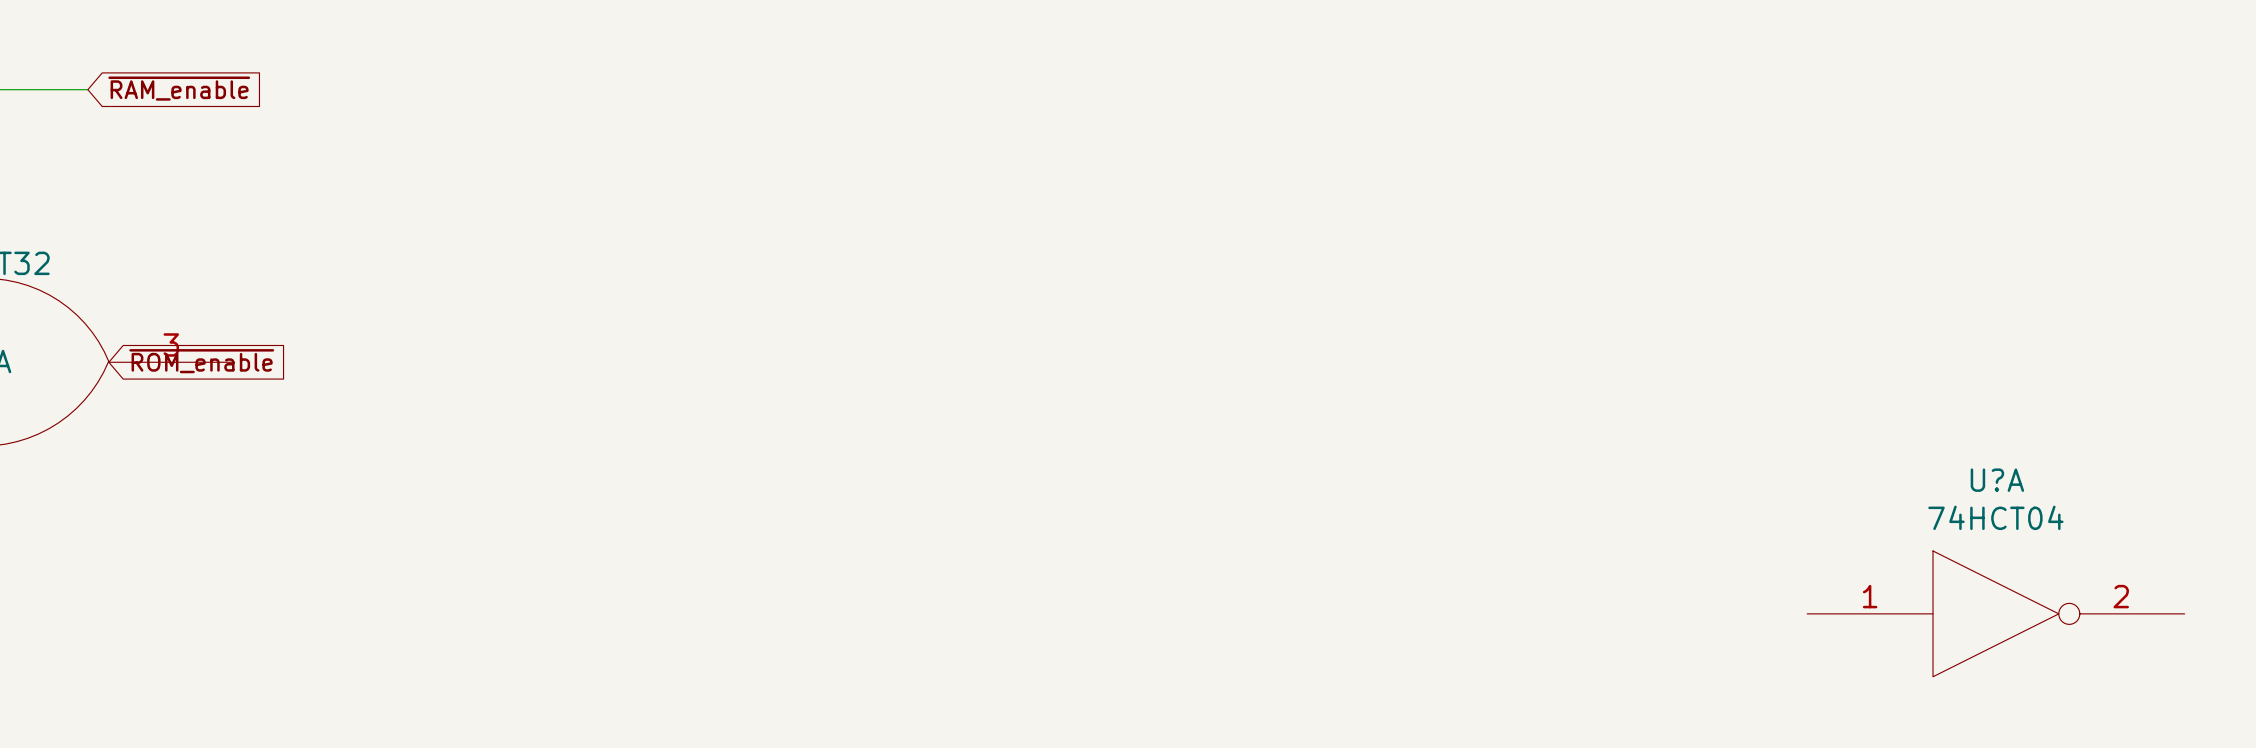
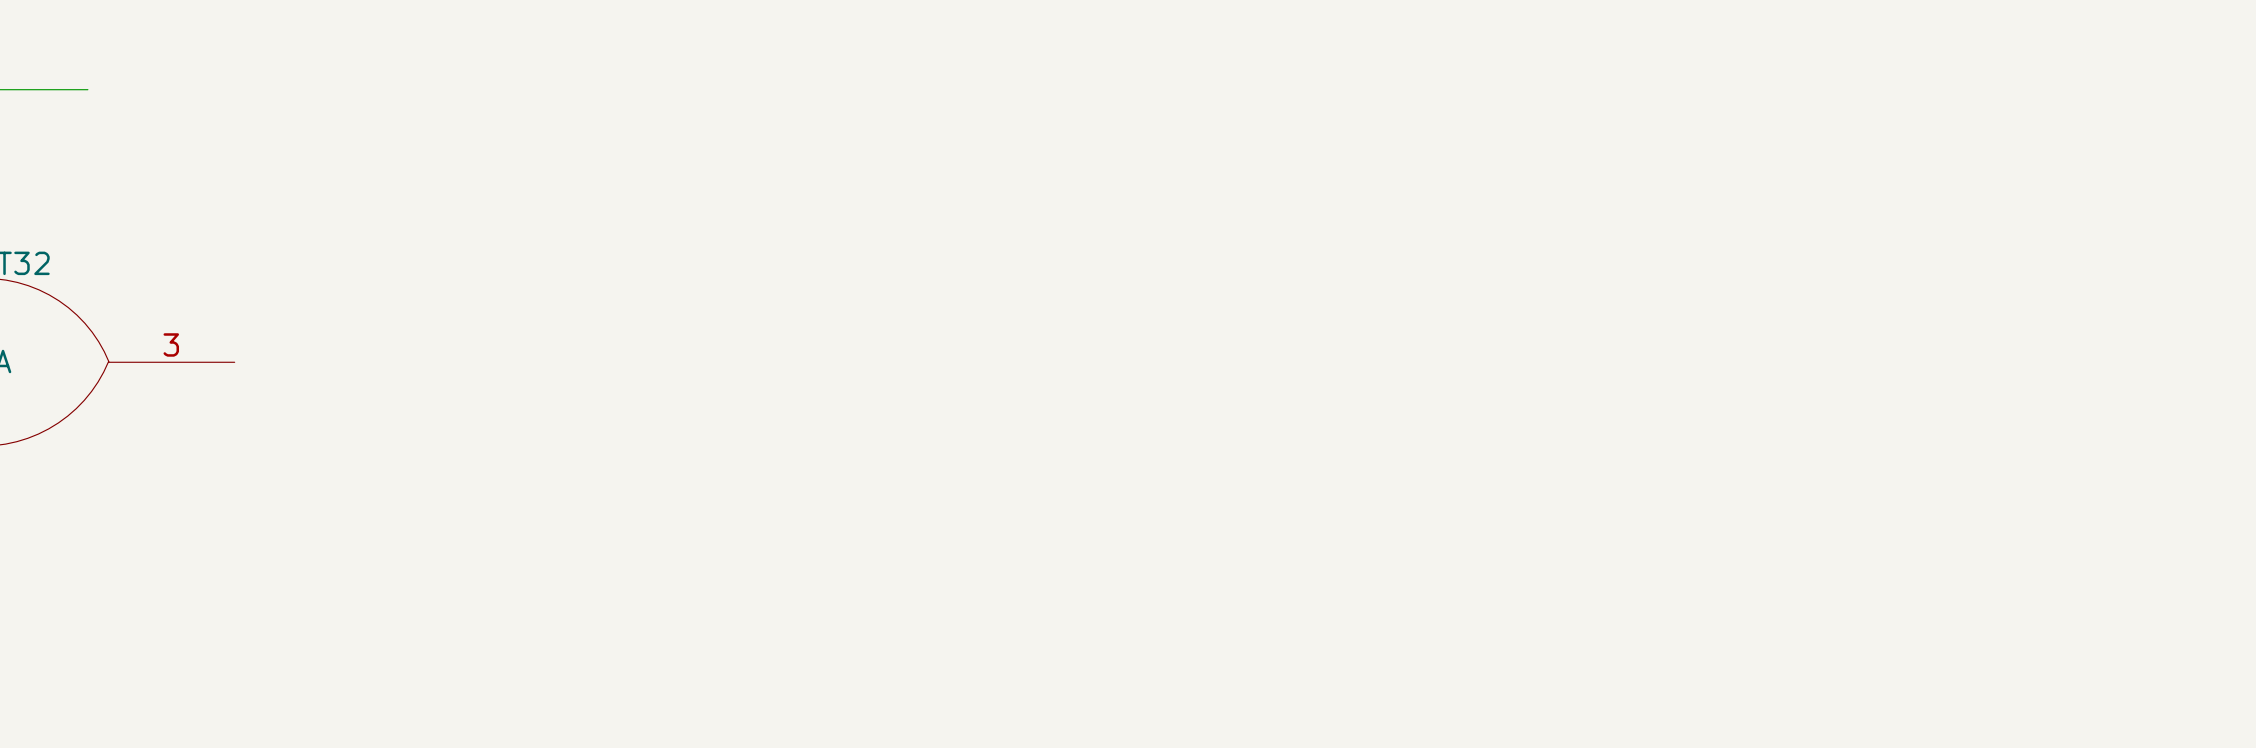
global label: ~{RAM_enable} (179, 88) -> none
global label: ~{ROM_enable} (201, 361) -> none
U?A: 74HCT04 (1995, 613) -> none

